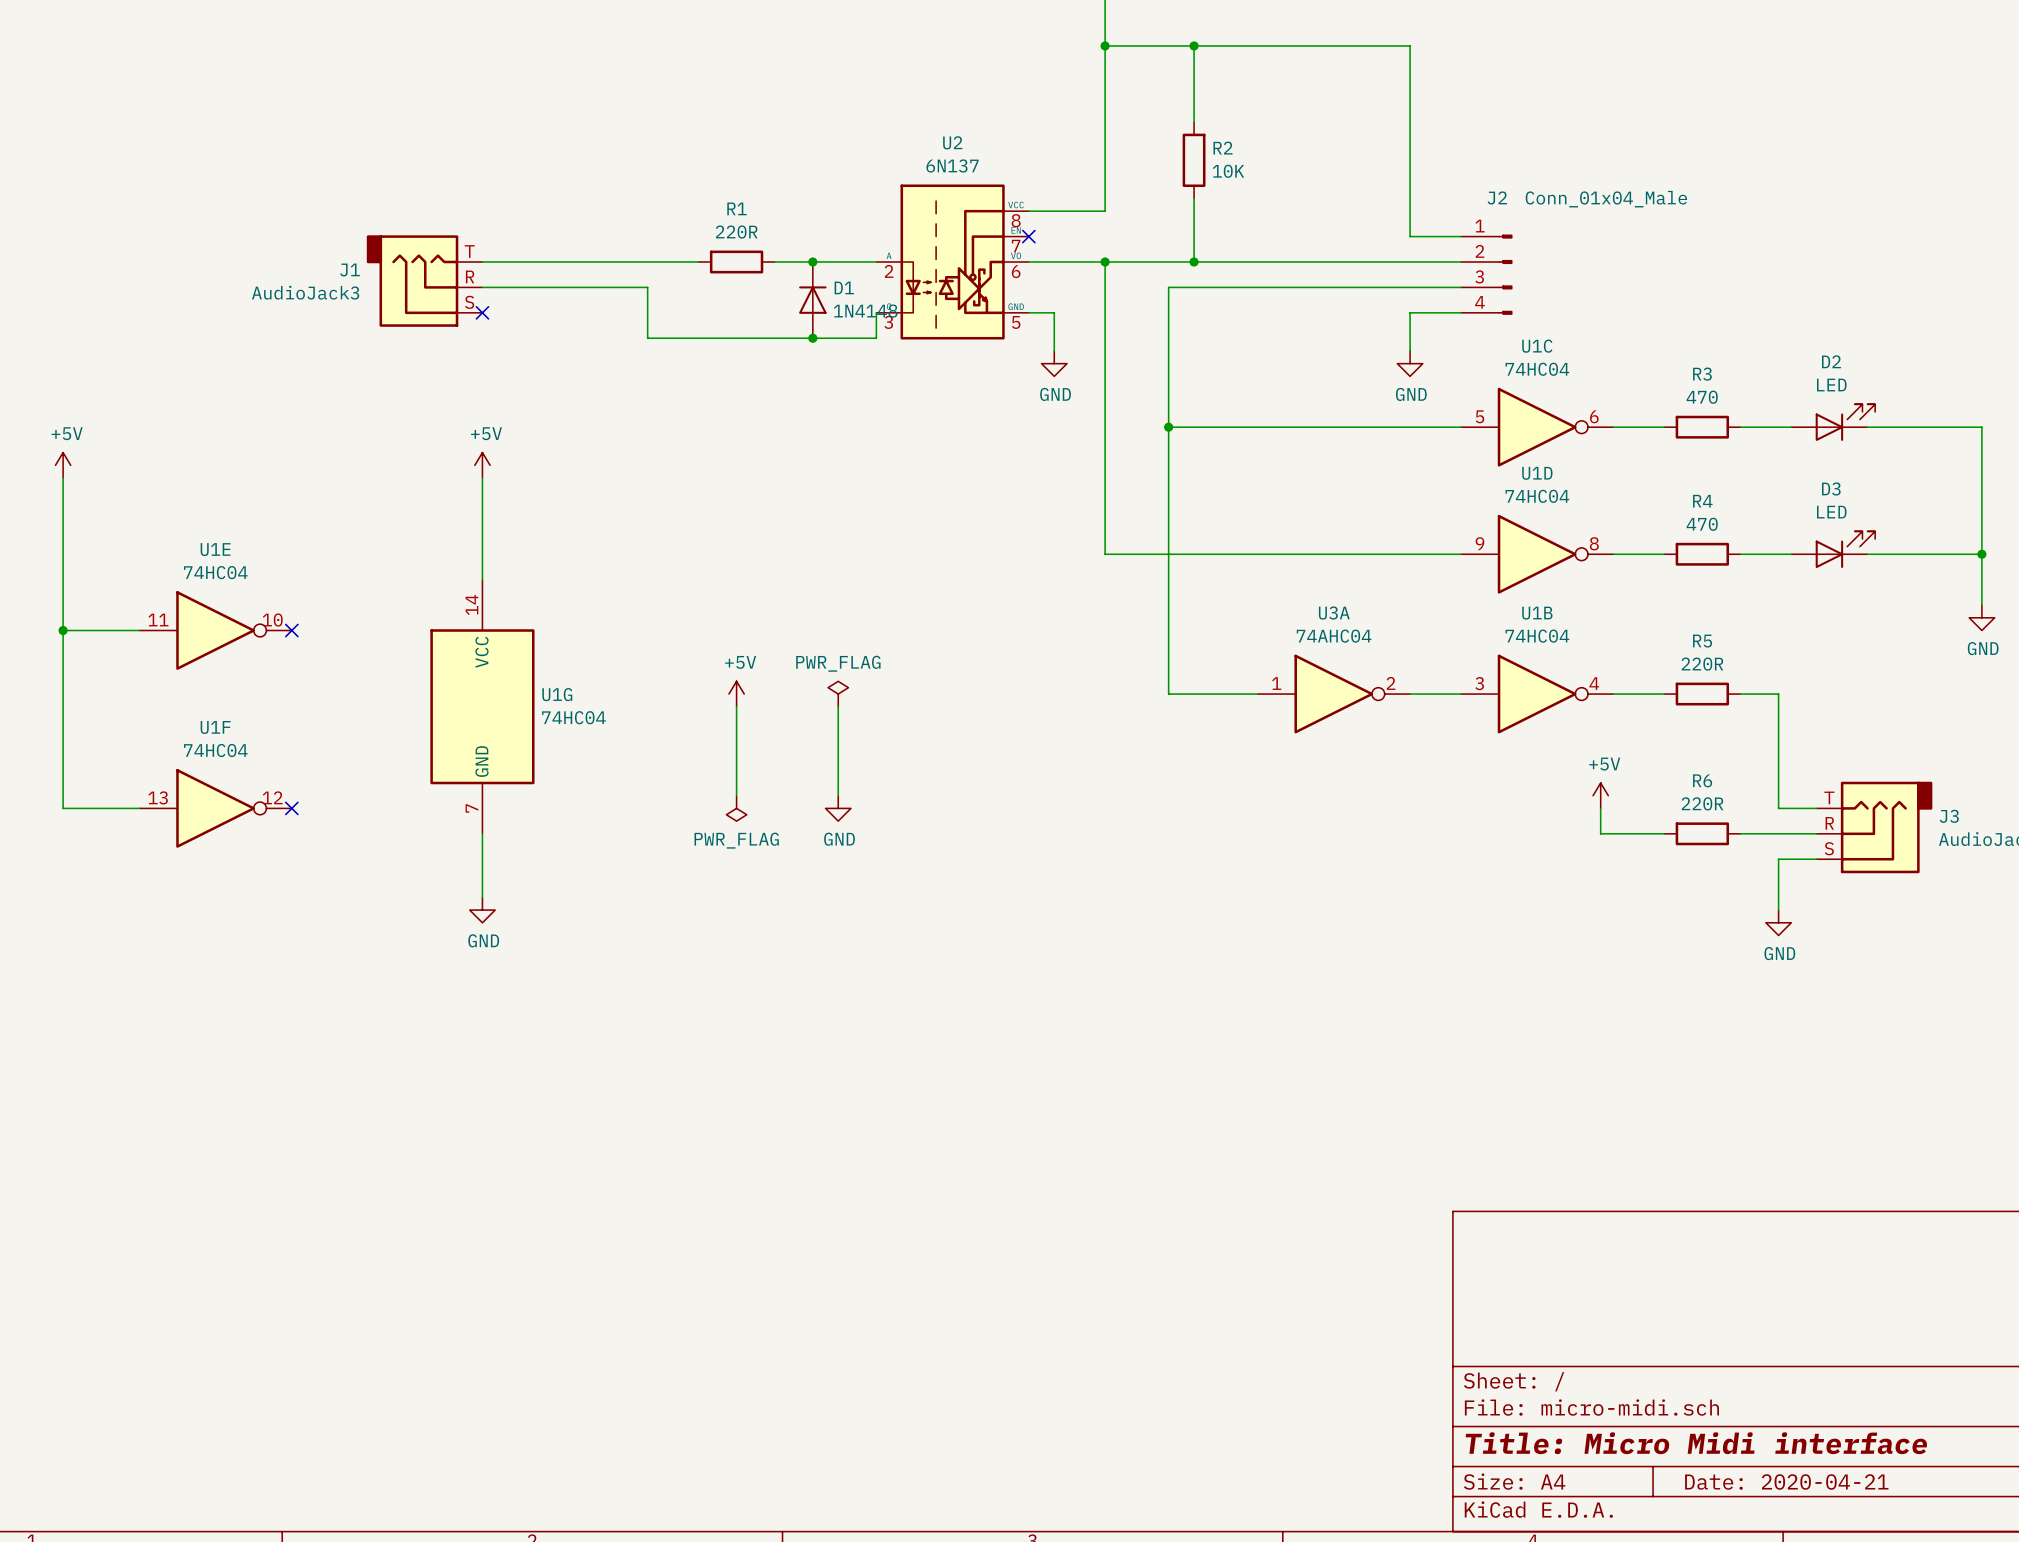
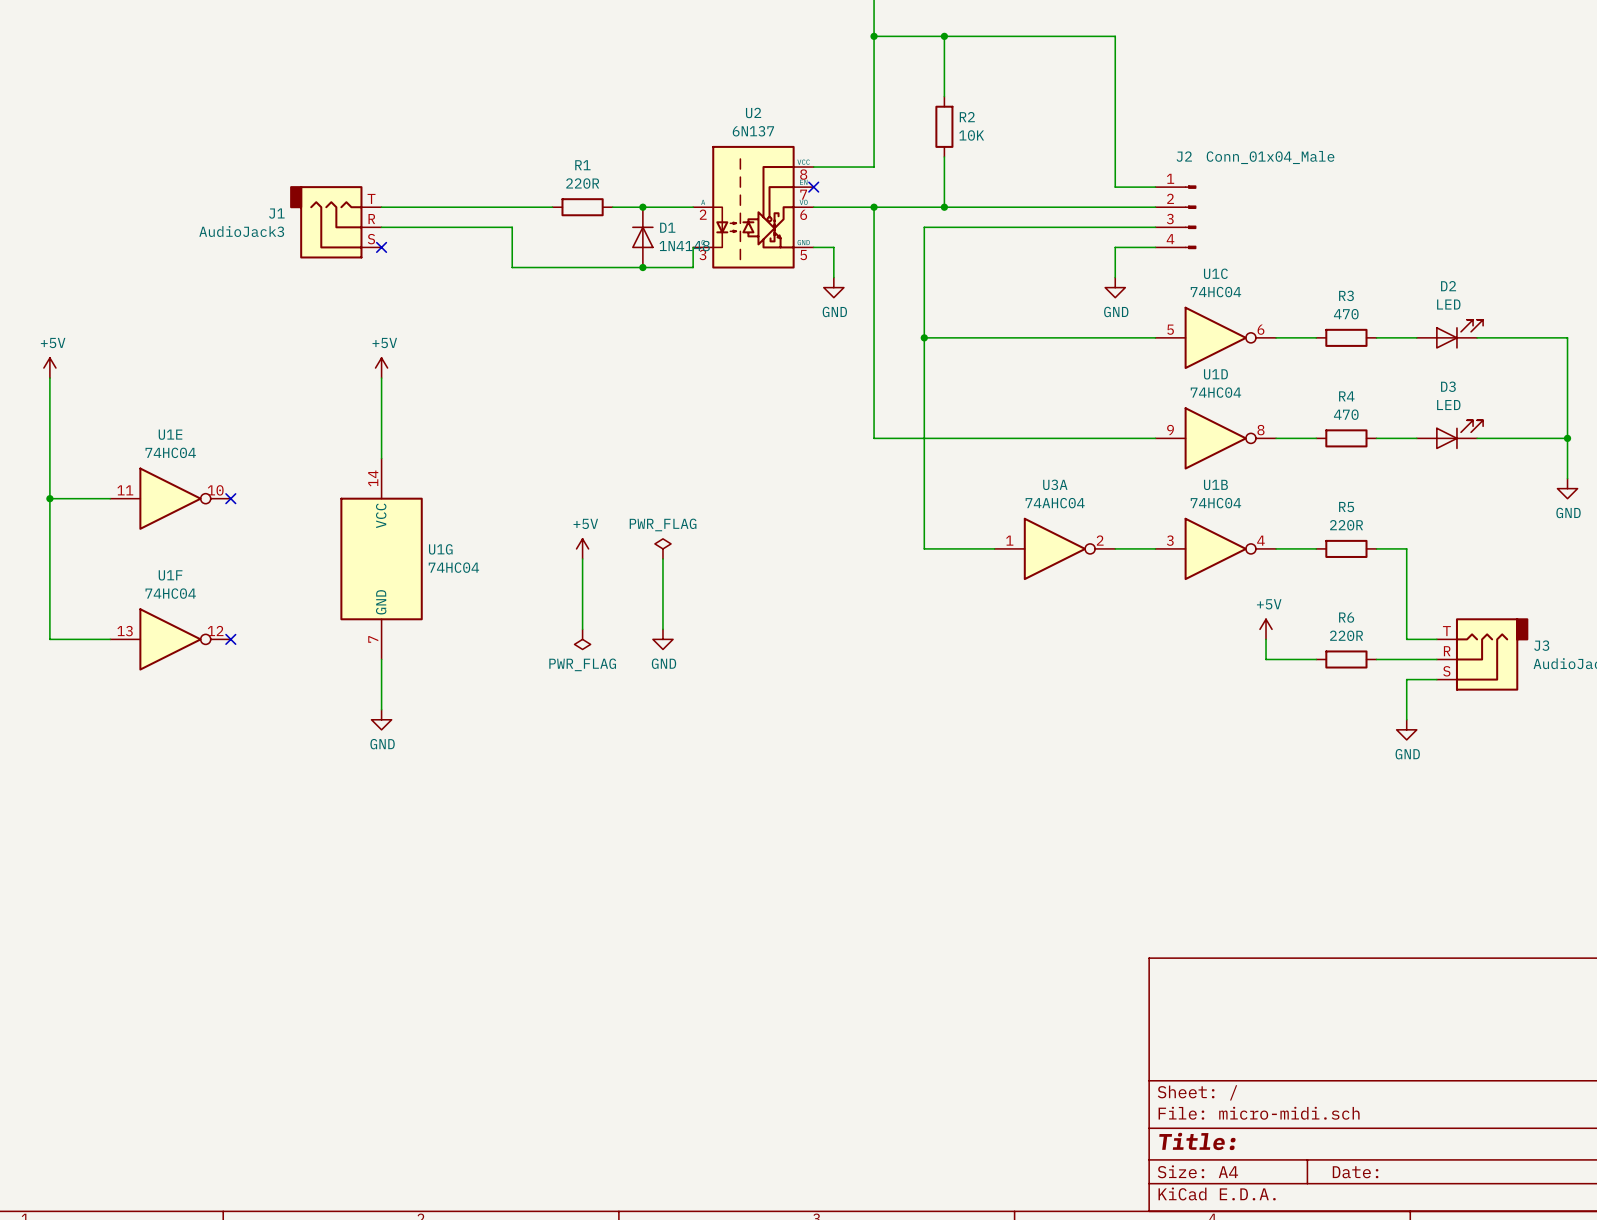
title block: Title: Micro Midi interface (1696, 1443) -> Title: (1197, 1141)
title block: Date: 2020-04-21 (1786, 1482) -> Date: (1355, 1172)

